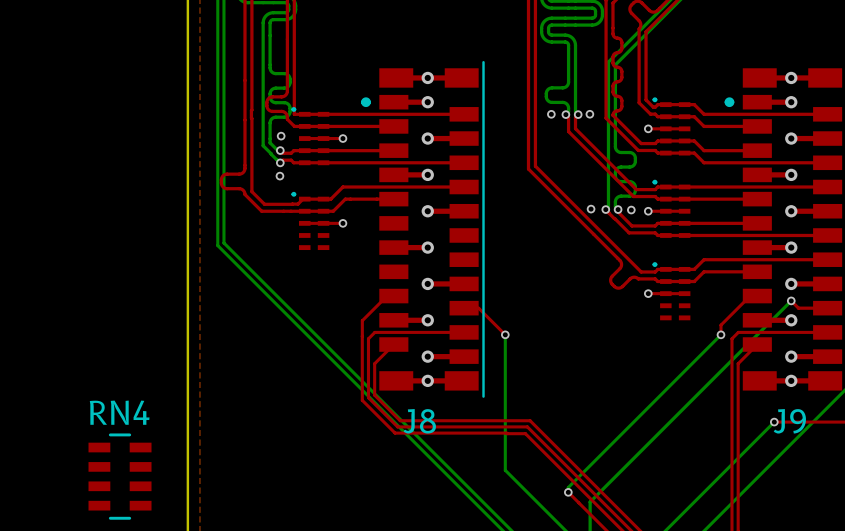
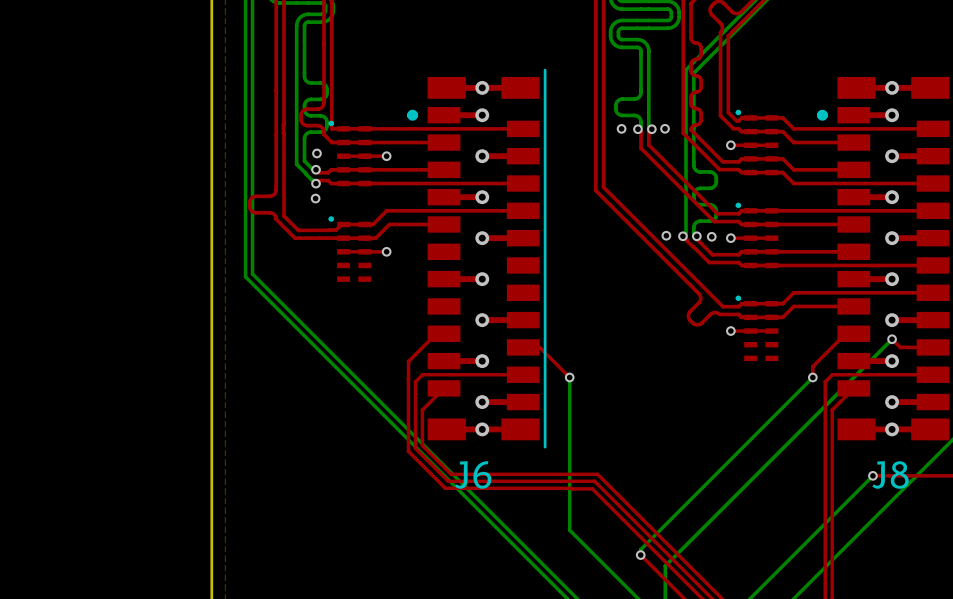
J8 name: J8 (419, 421) -> J6 (473, 474)
J9 name: J9 (789, 421) -> J8 (890, 474)
RN4: (120, 476) -> none

